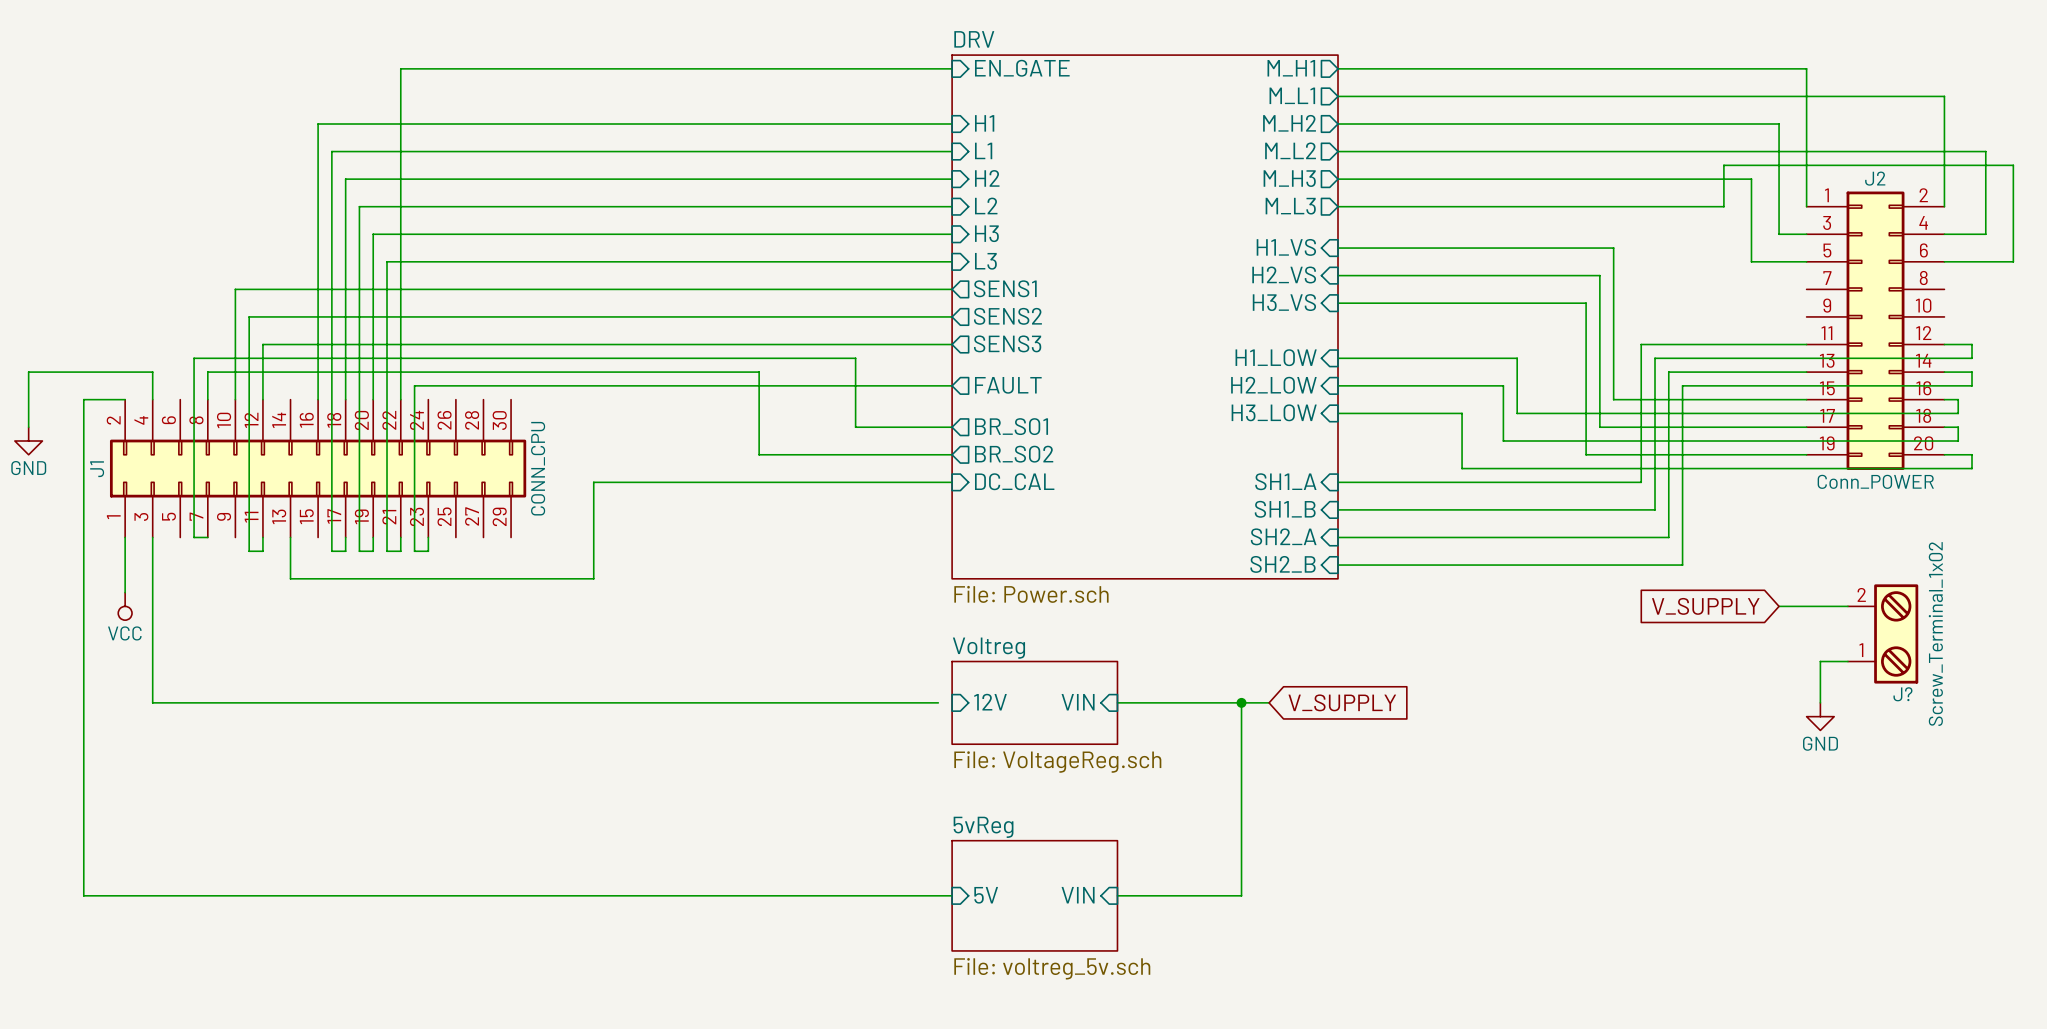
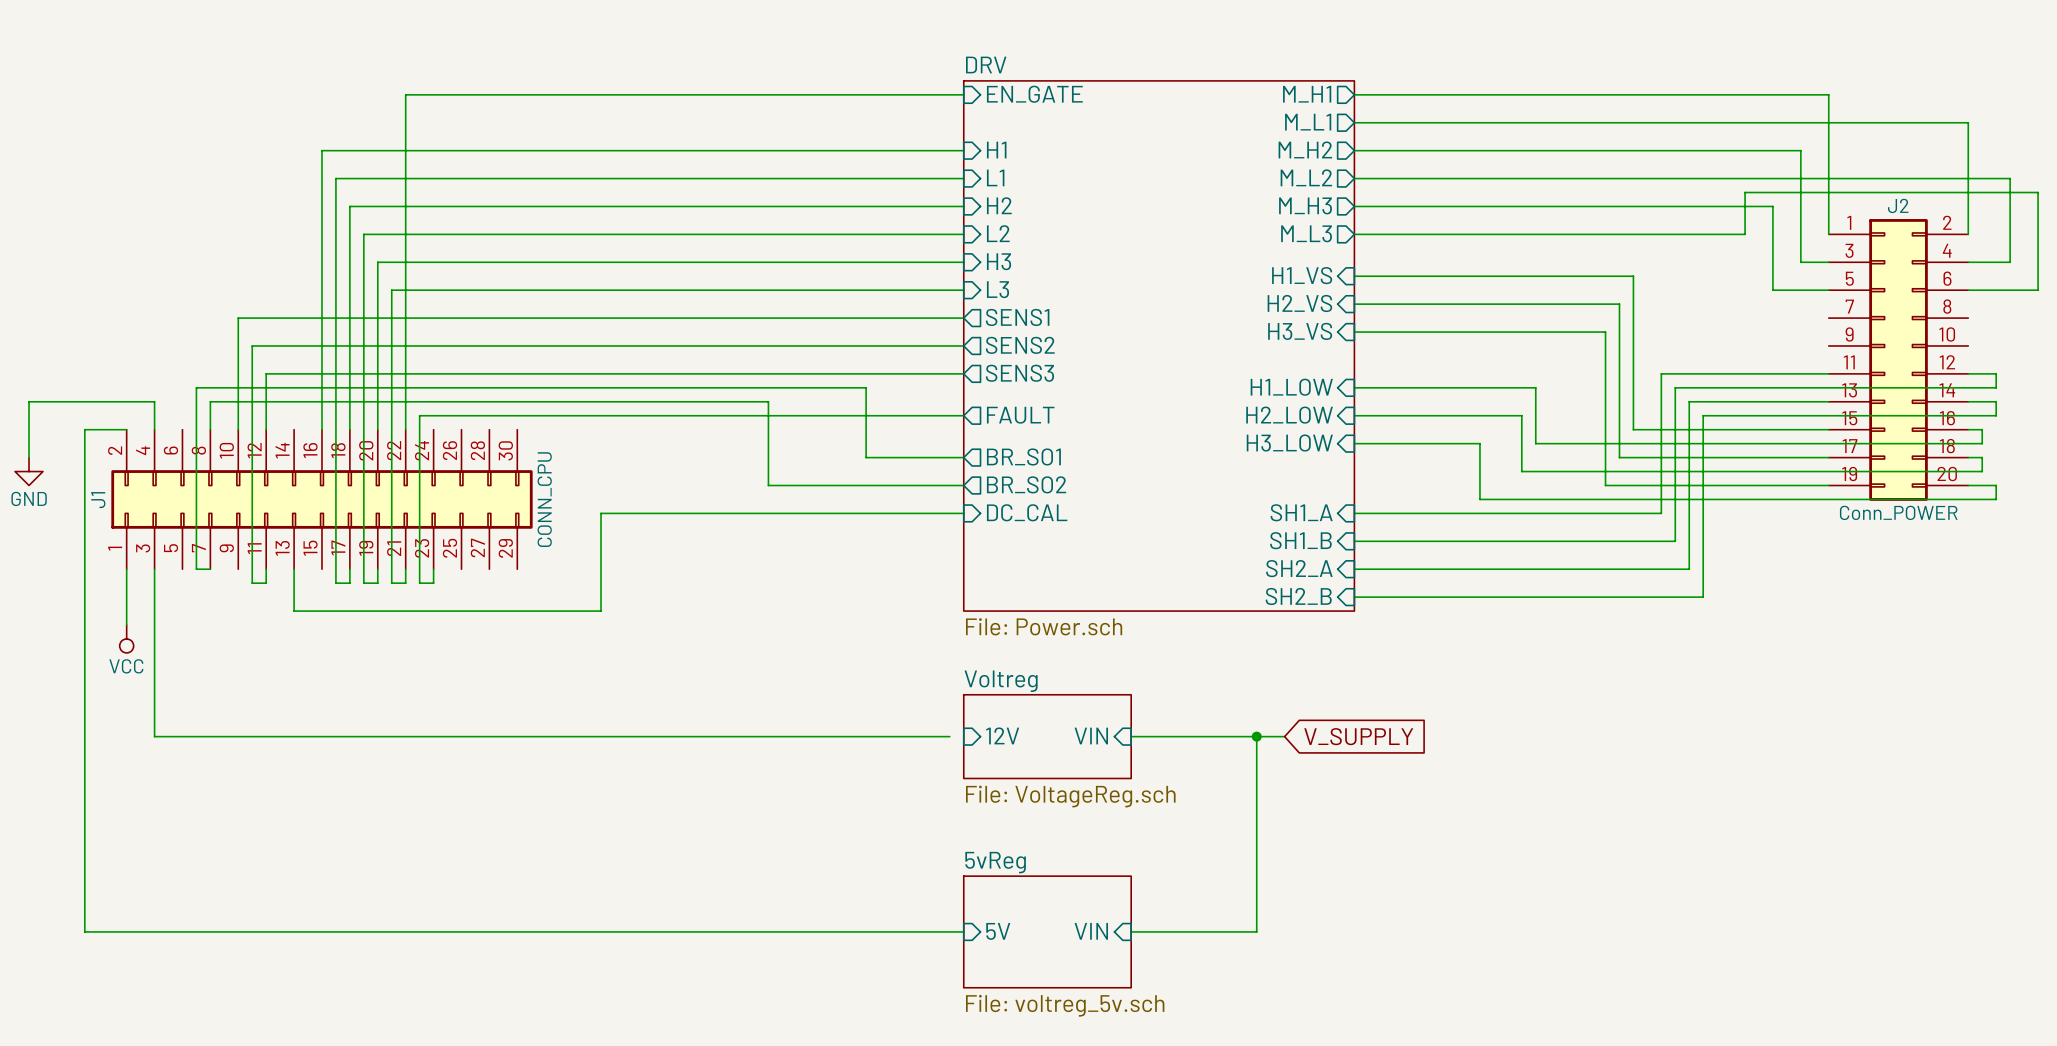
global label: V_SUPPLY (1705, 606) -> none
wire: (1779, 606) (1847, 606) -> none
J?: Screw_Terminal_1x02 (1883, 633) -> none
wire: (1847, 661) (1820, 661) (1820, 702) -> none
power symbol: GND (1820, 716) -> none

